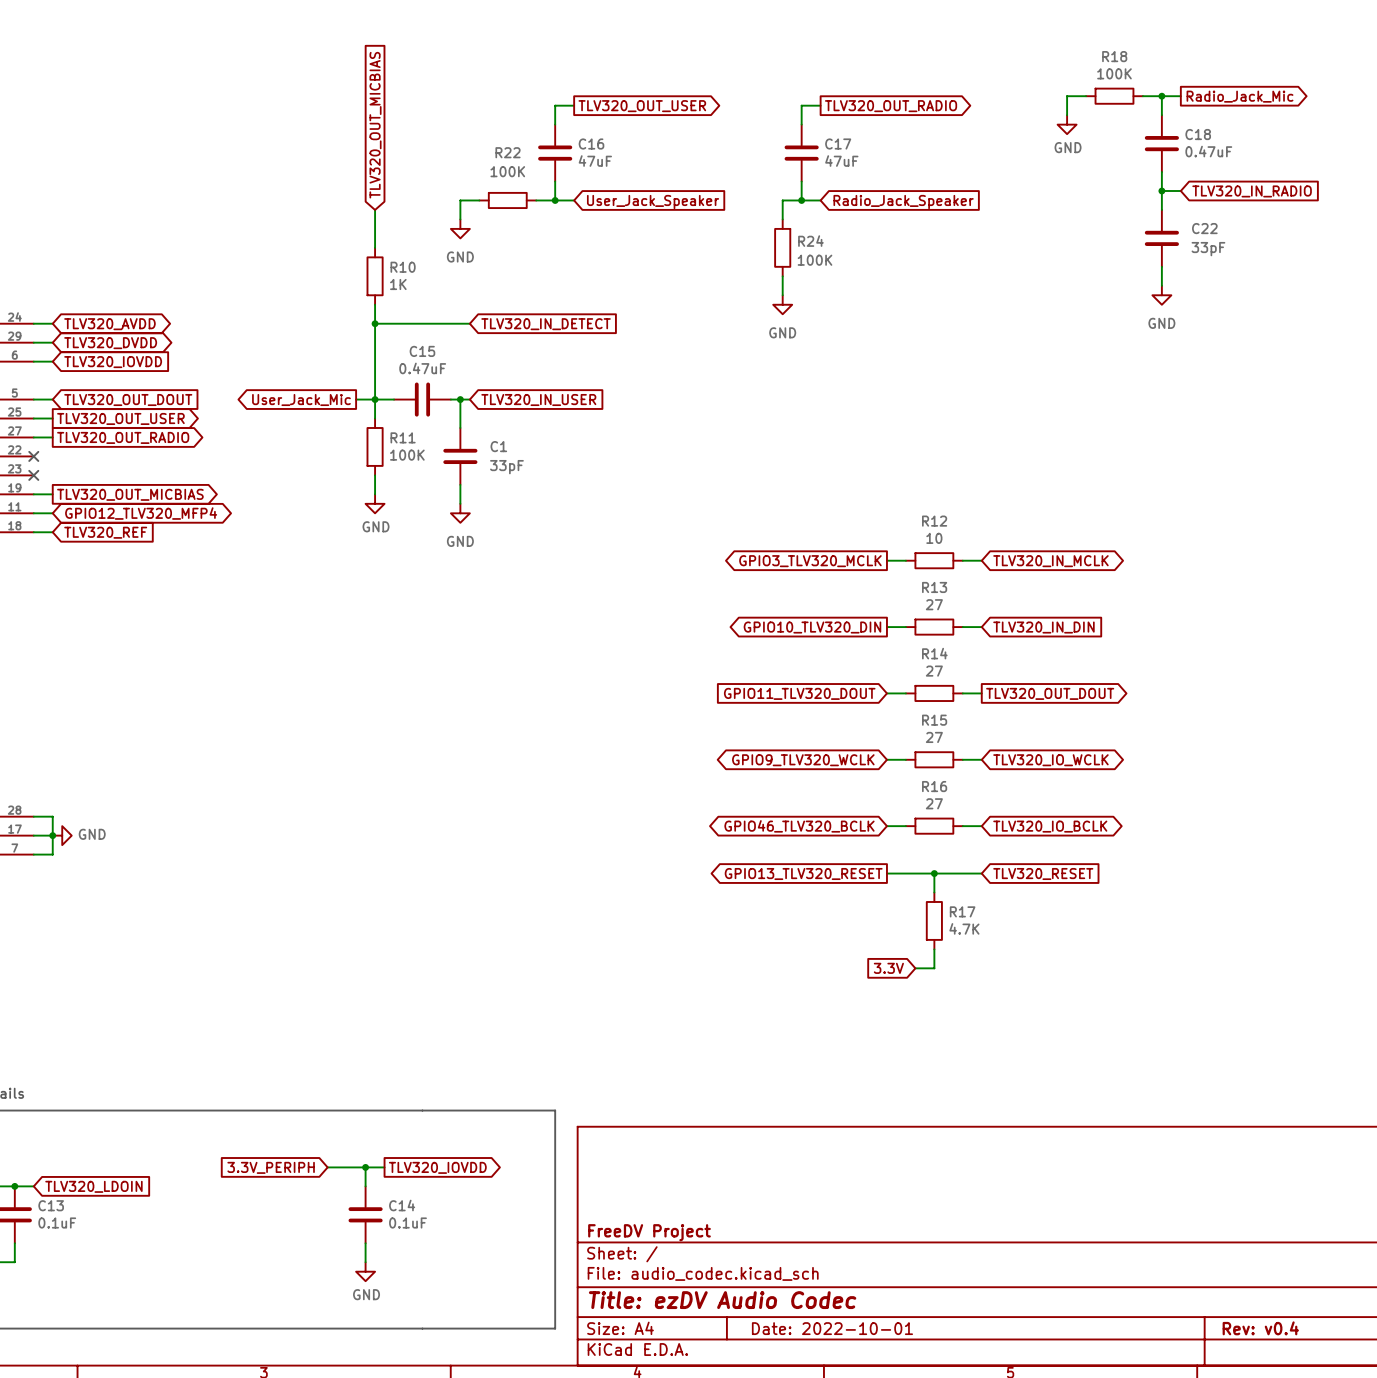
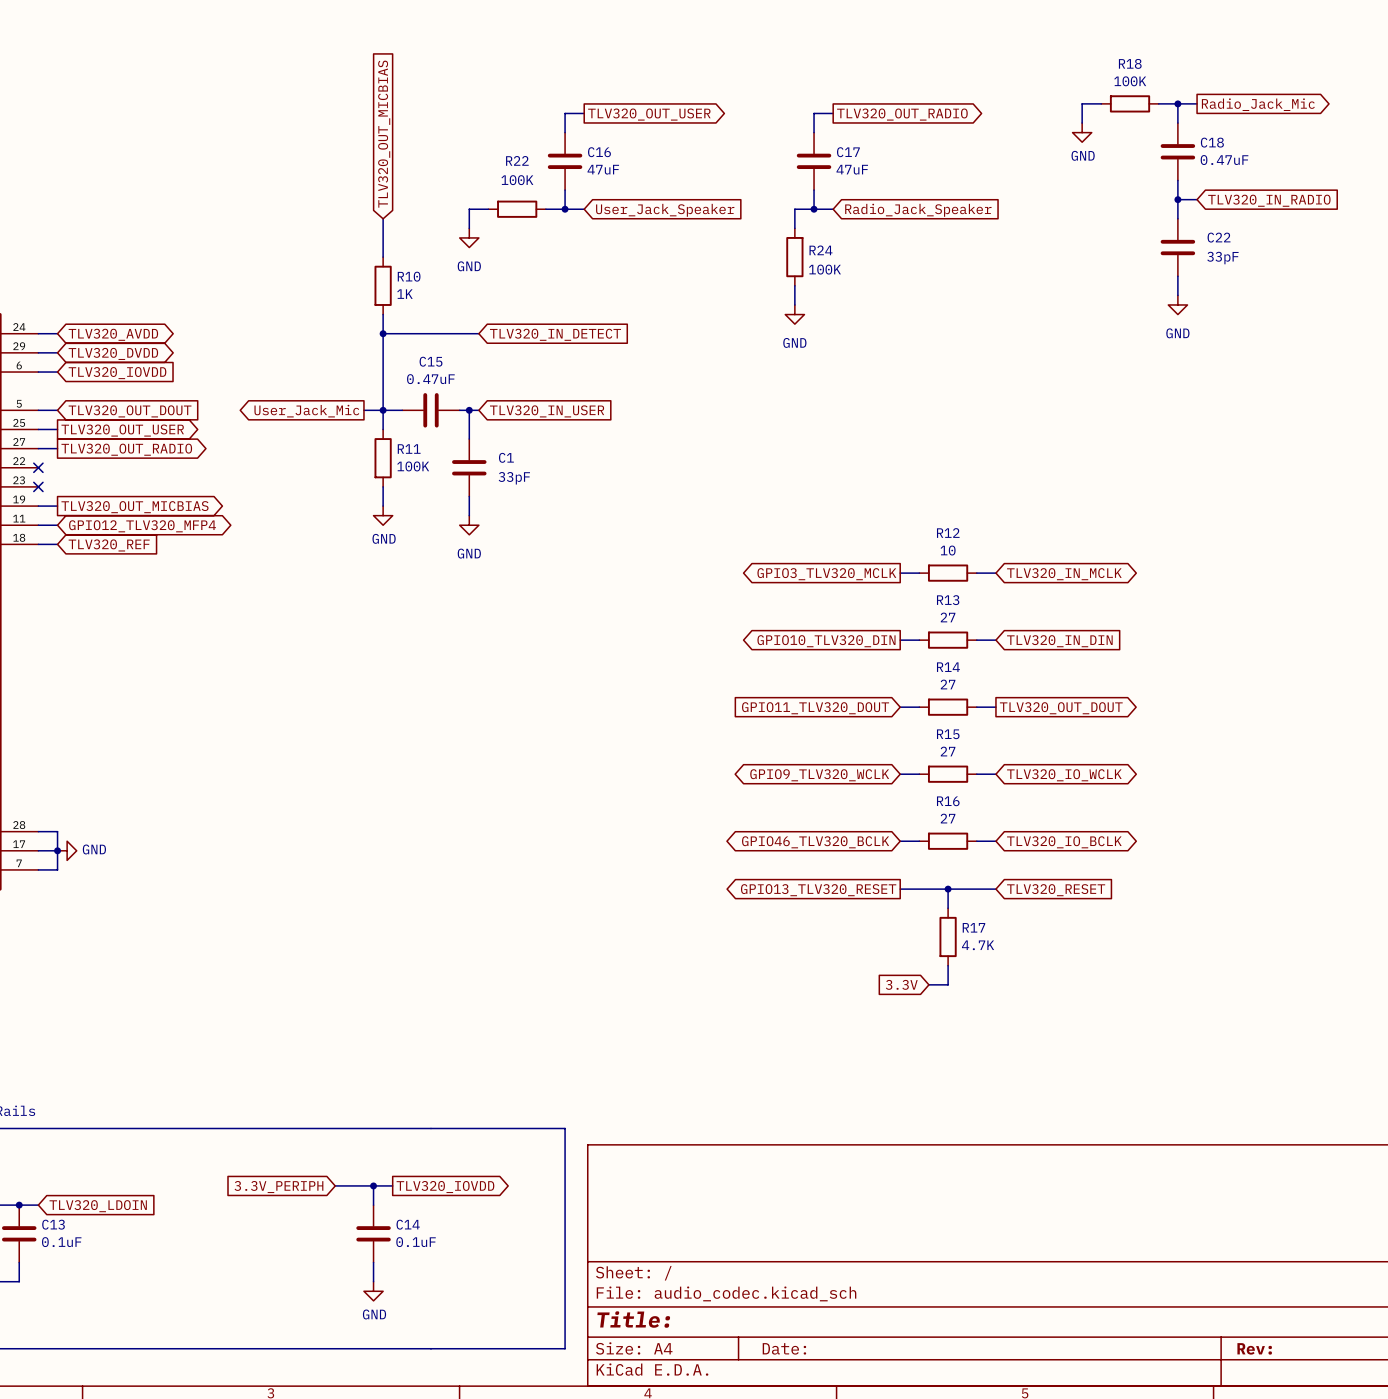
title block: FreeDV Project (649, 1232) -> none
title block: Title: ezDV Audio Codec (722, 1300) -> Title: (633, 1319)
title block: Date: 2022-10-01 (832, 1328) -> Date: (784, 1348)
title block: Rev: v0.4 (1260, 1328) -> Rev: (1254, 1348)

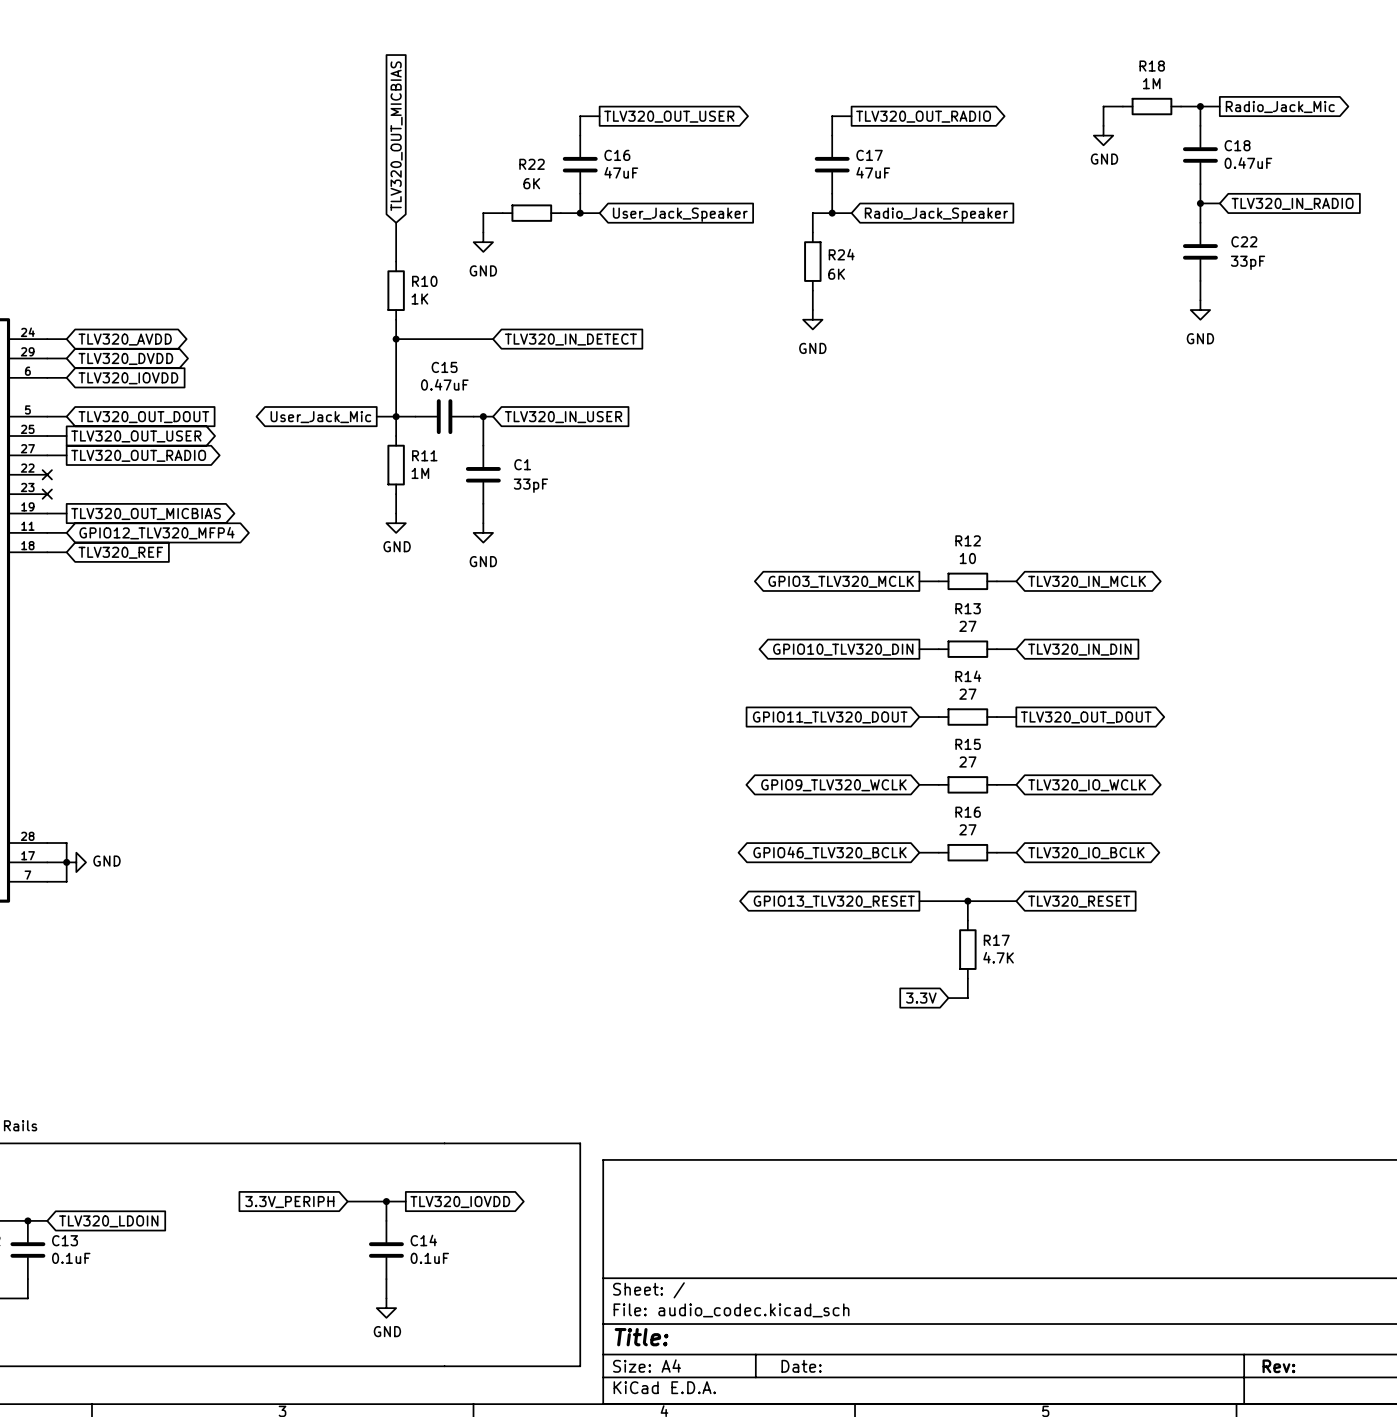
R18 value: 100K (1130, 81) -> 1M (1151, 83)
R22 value: 100K (517, 180) -> 6K (531, 183)
R24 value: 100K (824, 269) -> 6K (836, 274)
R11 value: 100K (413, 466) -> 1M (420, 473)

